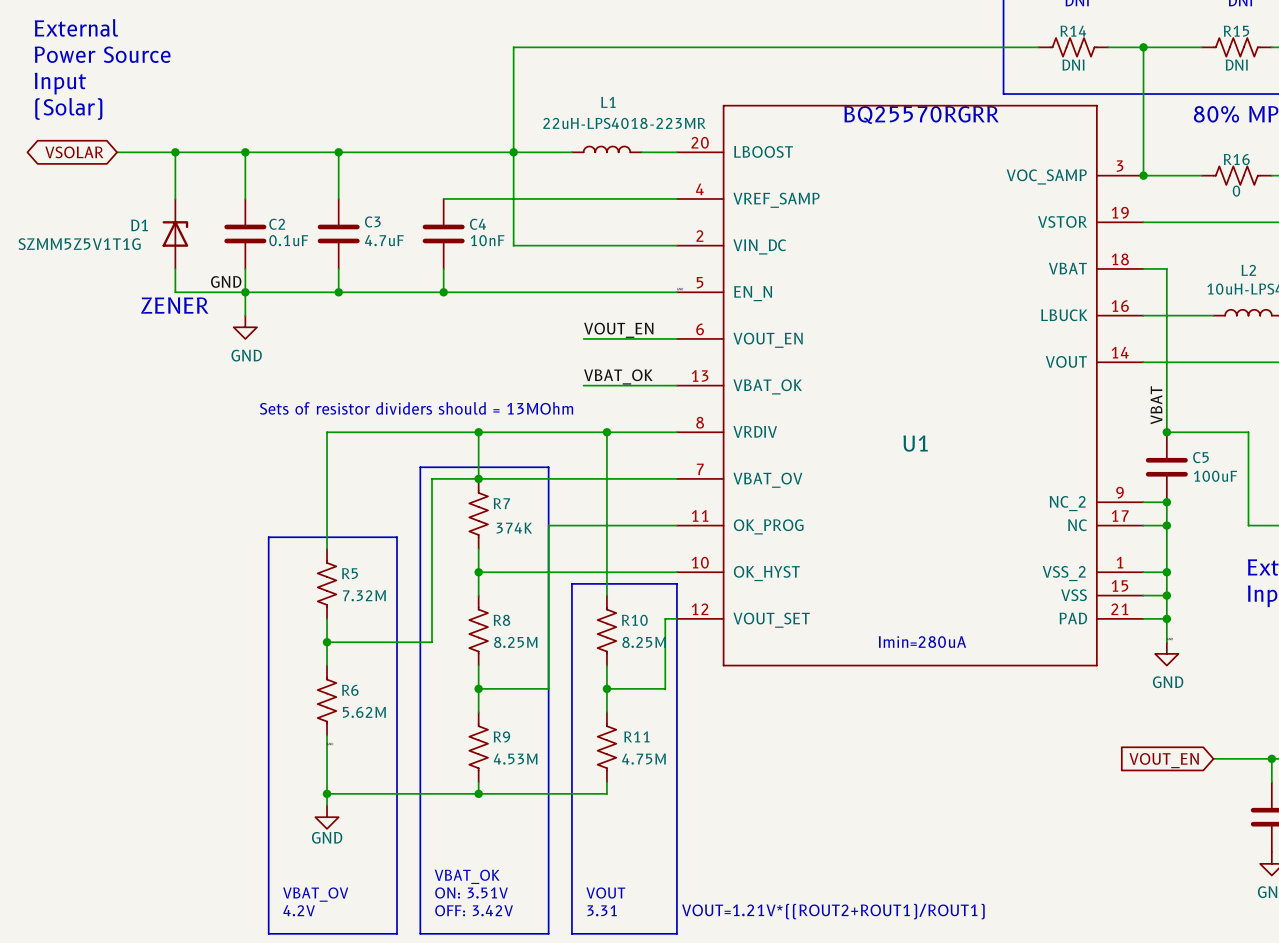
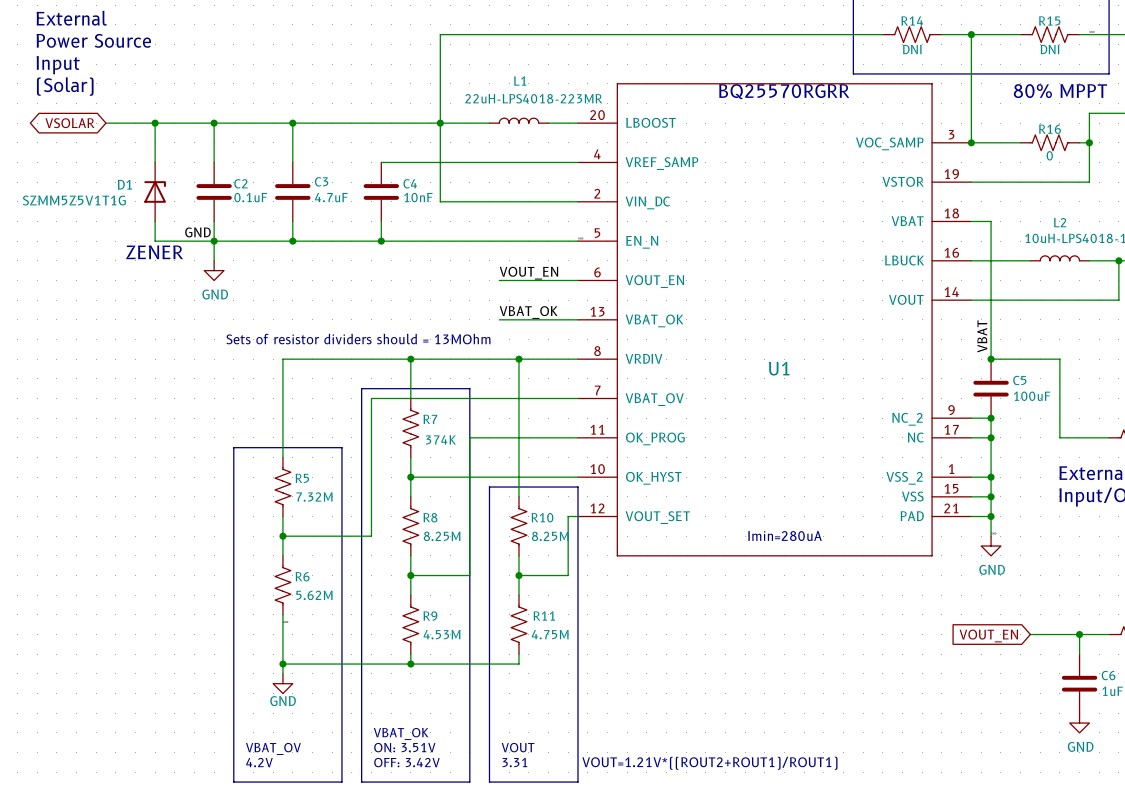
junction: (478, 478) -> none

